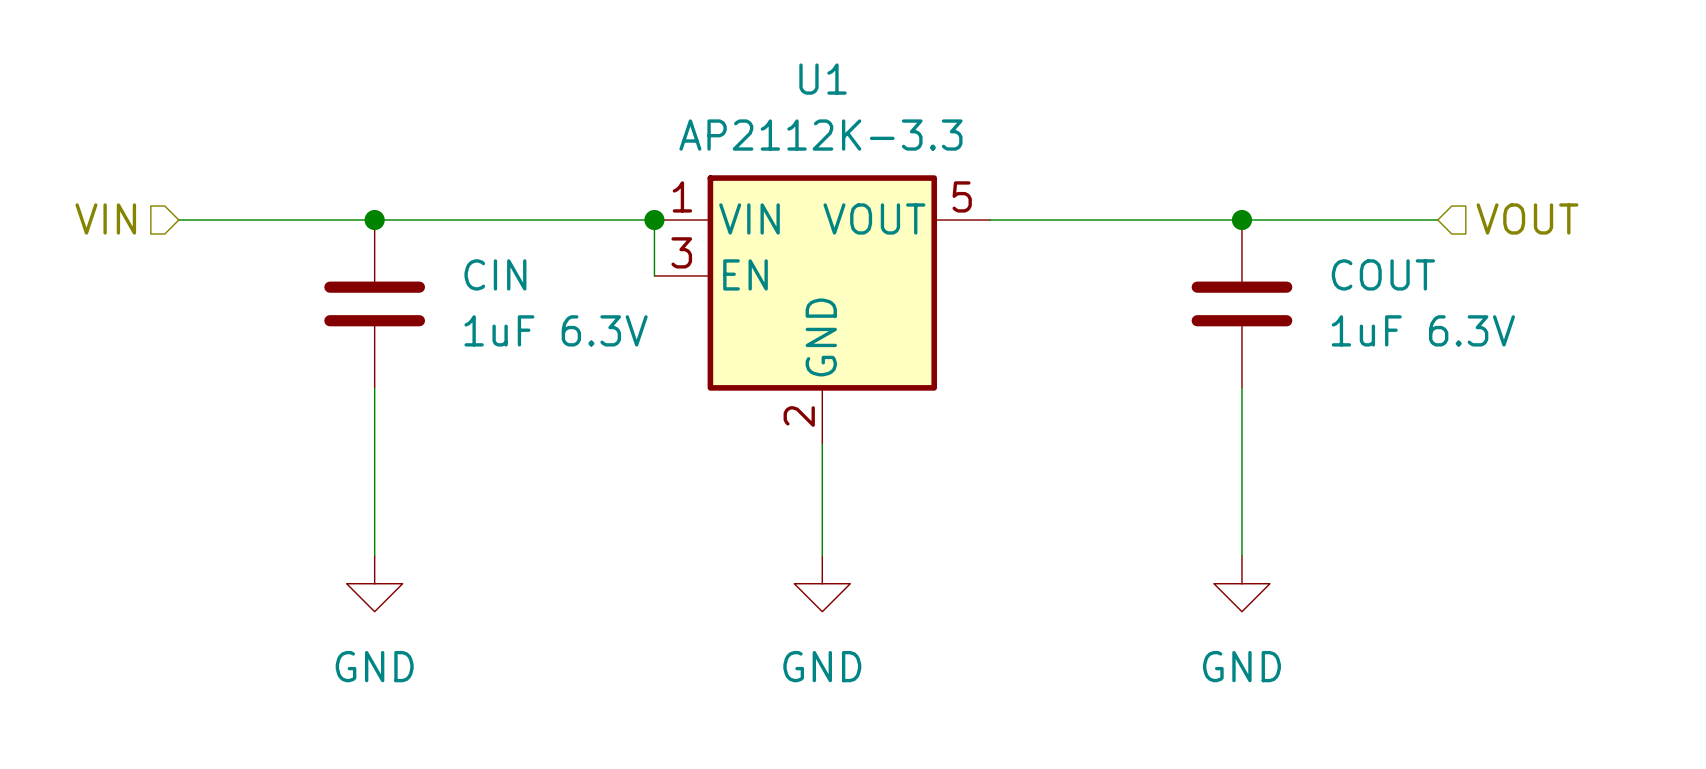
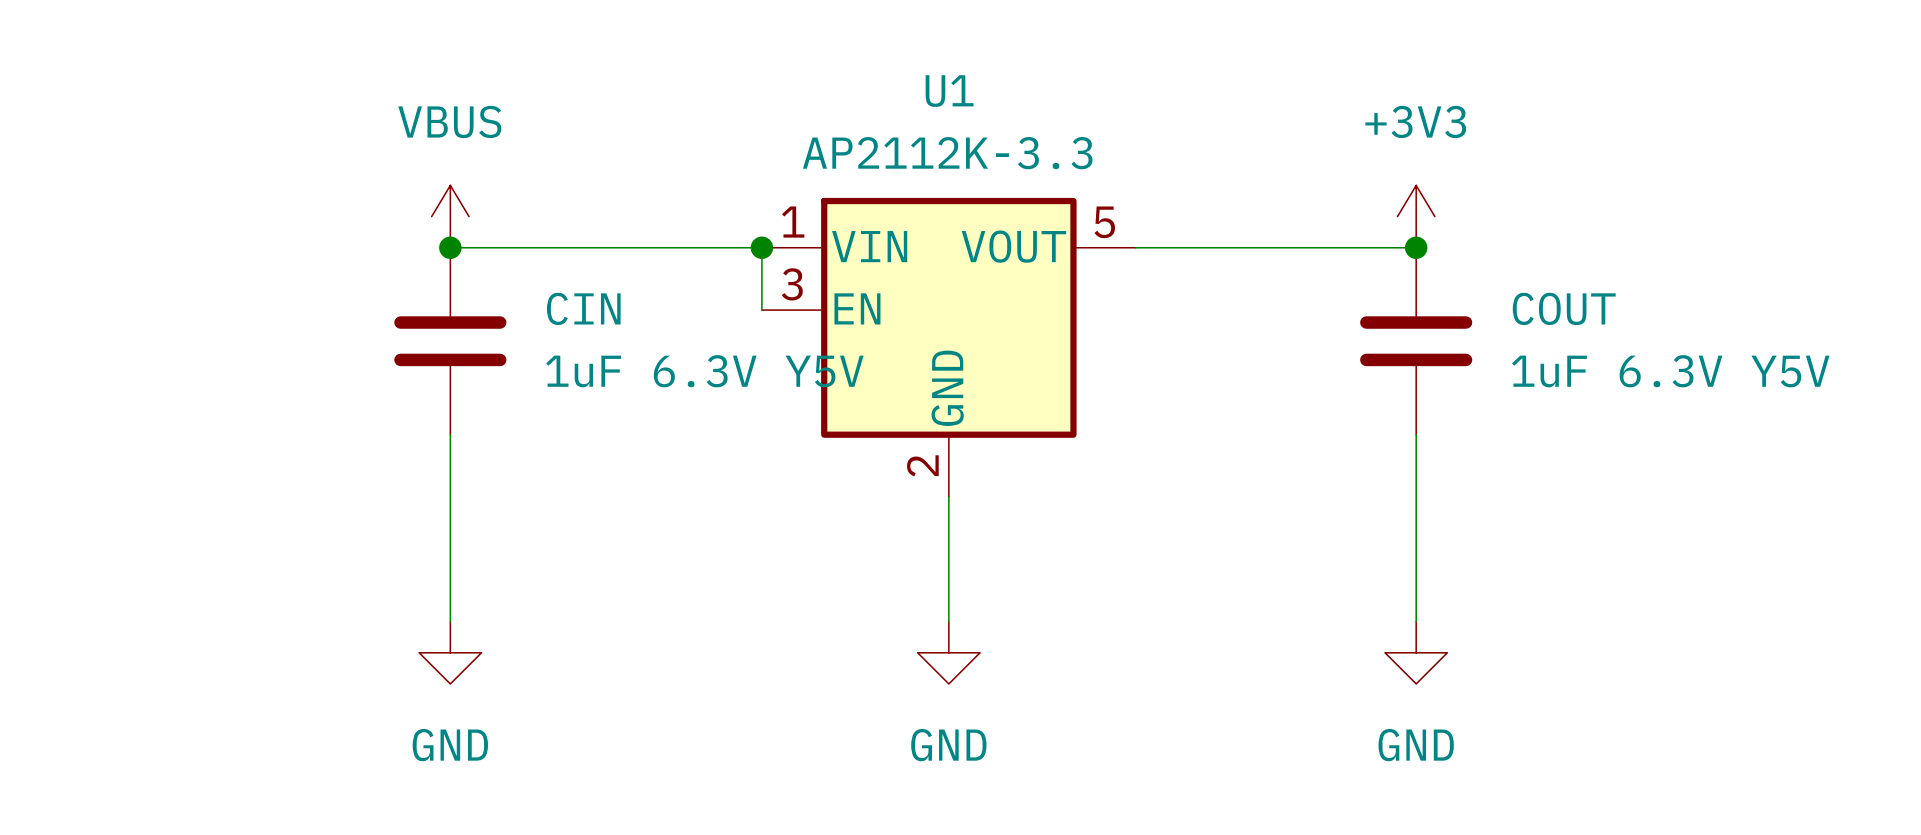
power symbol: none -> VBUS (450, 216)
power symbol: none -> +3V3 (1416, 216)
hierarchical label: VIN (105, 218) -> none
hierarchical label: VOUT (1527, 218) -> none
wire: (178, 220) (374, 220) -> none
wire: (1241, 220) (1437, 220) -> none
CIN value: 1uF 6.3V (556, 330) -> 1uF 6.3V Y5V (704, 371)
COUT value: 1uF 6.3V (1423, 330) -> 1uF 6.3V Y5V (1670, 371)

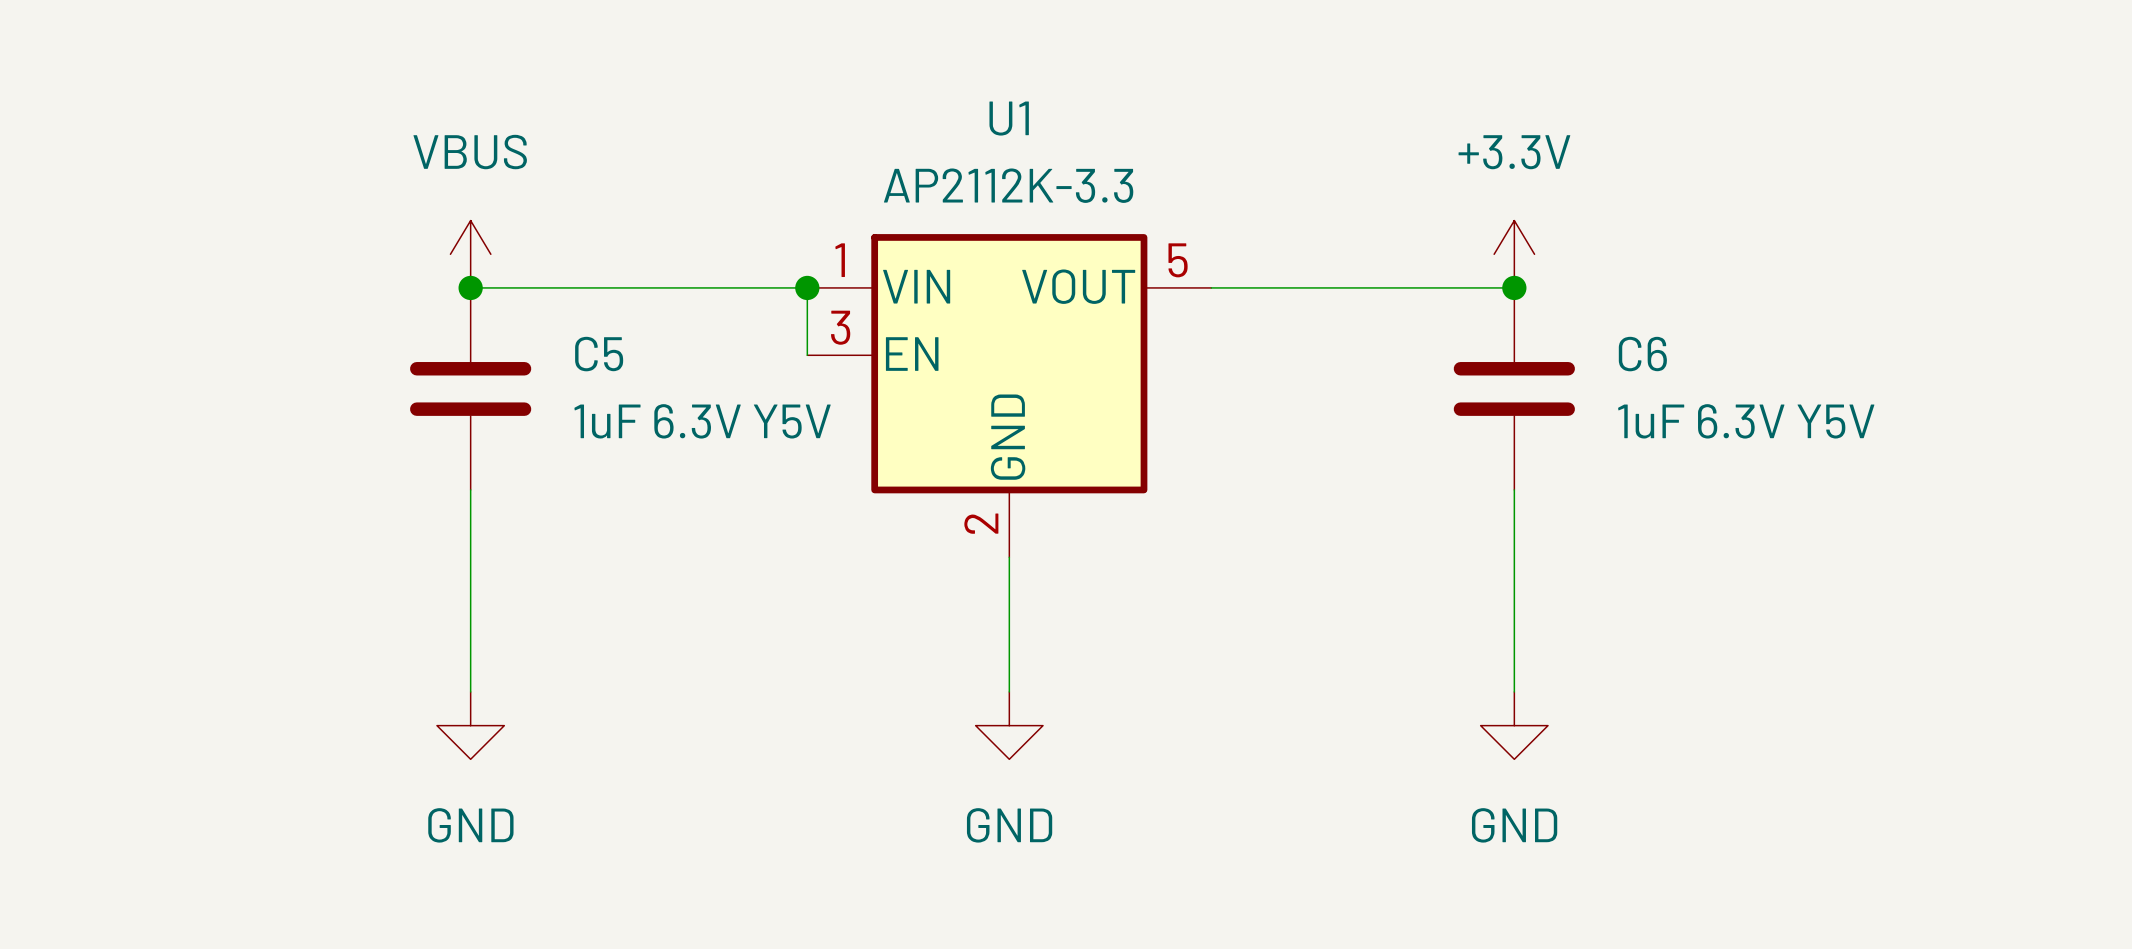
power symbol: +3V3 (1416, 216) -> +3.3V (1514, 254)
CIN name: CIN (583, 308) -> C5 (599, 354)
COUT name: COUT (1564, 308) -> C6 (1642, 354)

